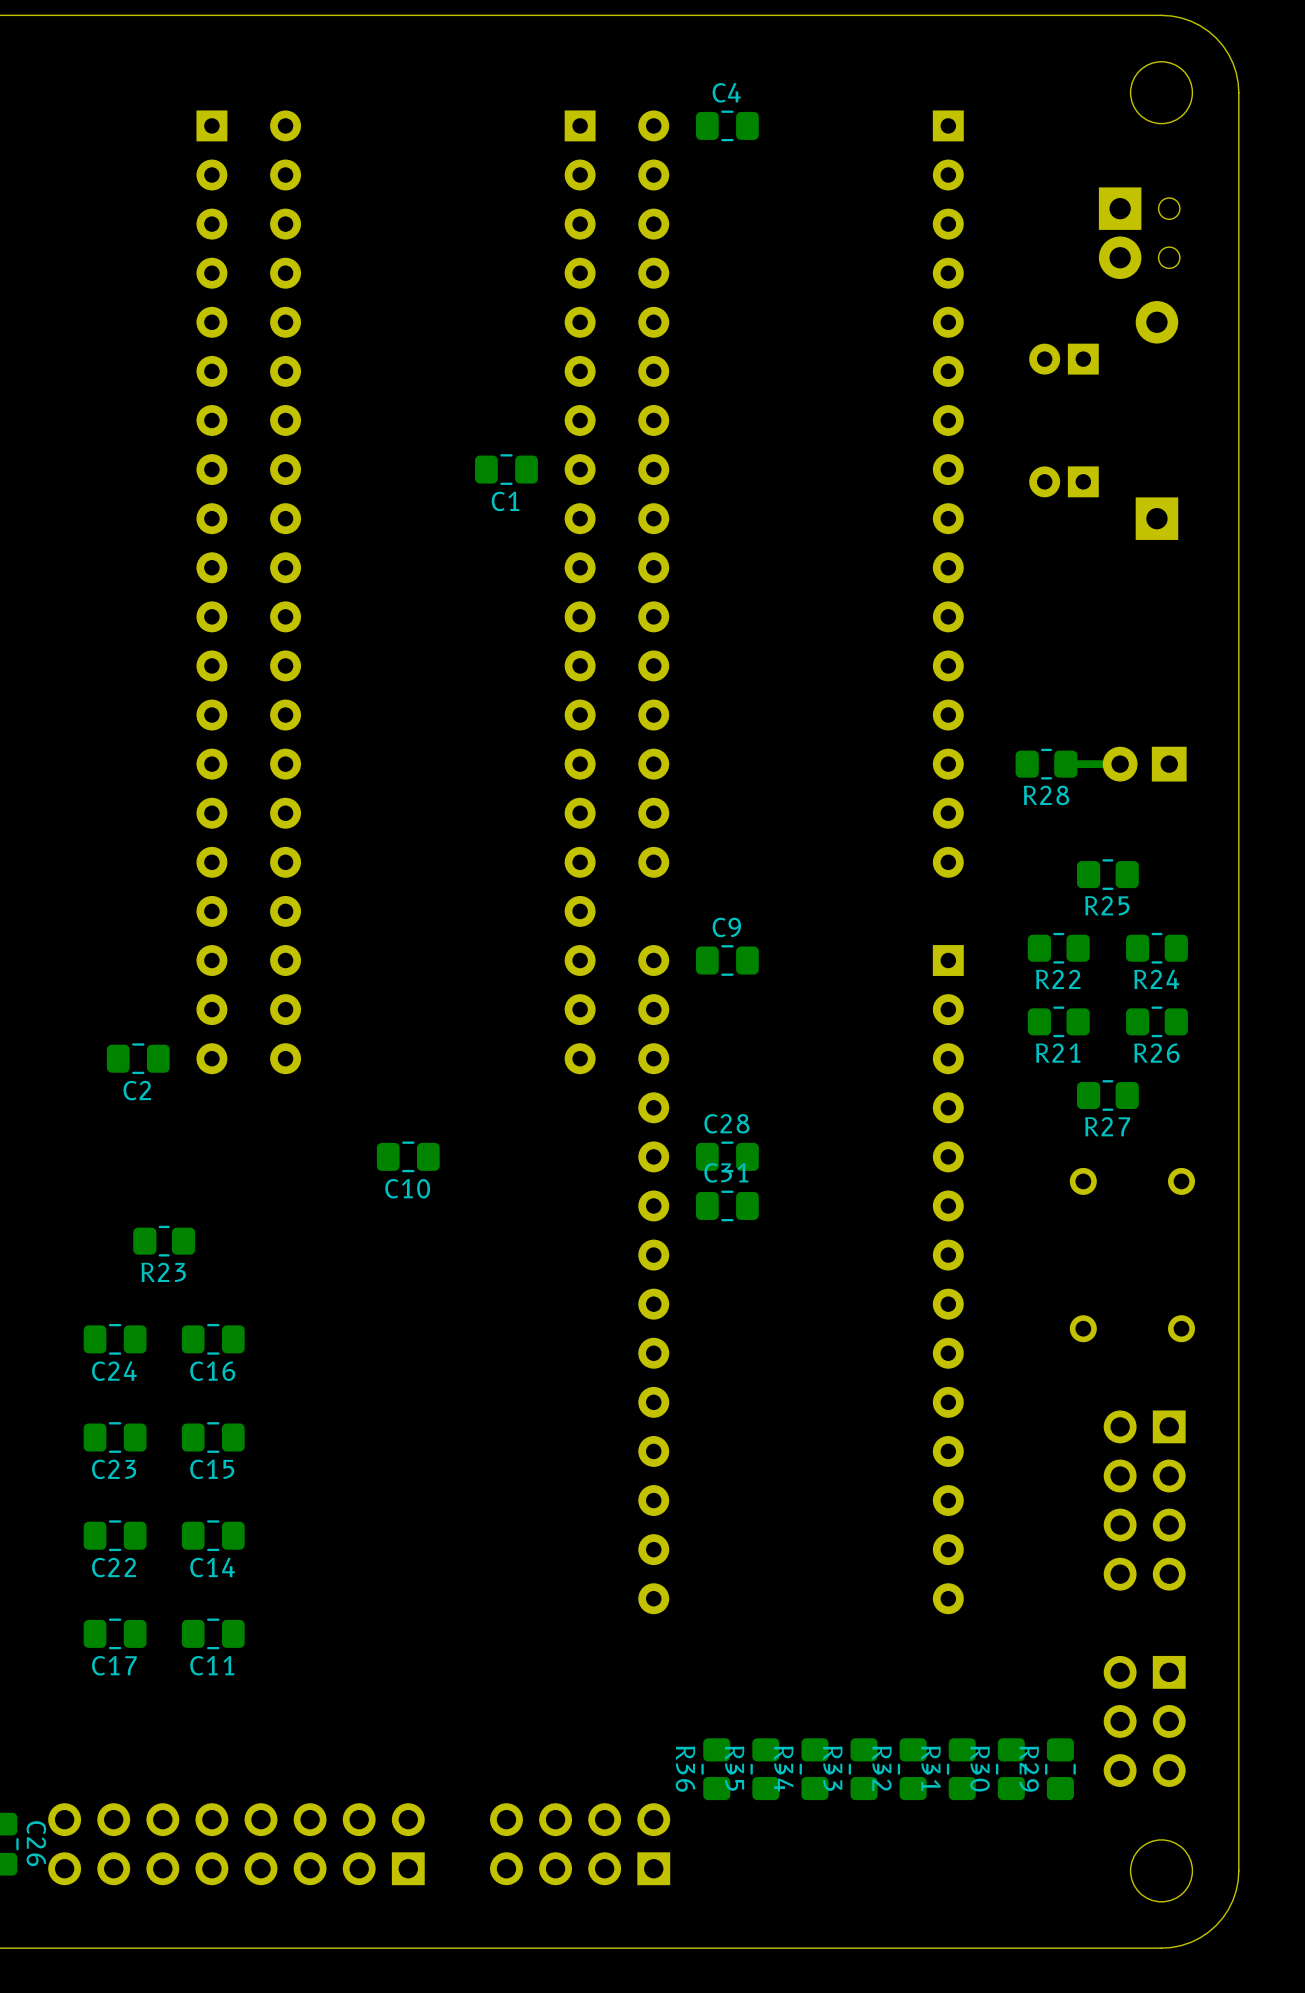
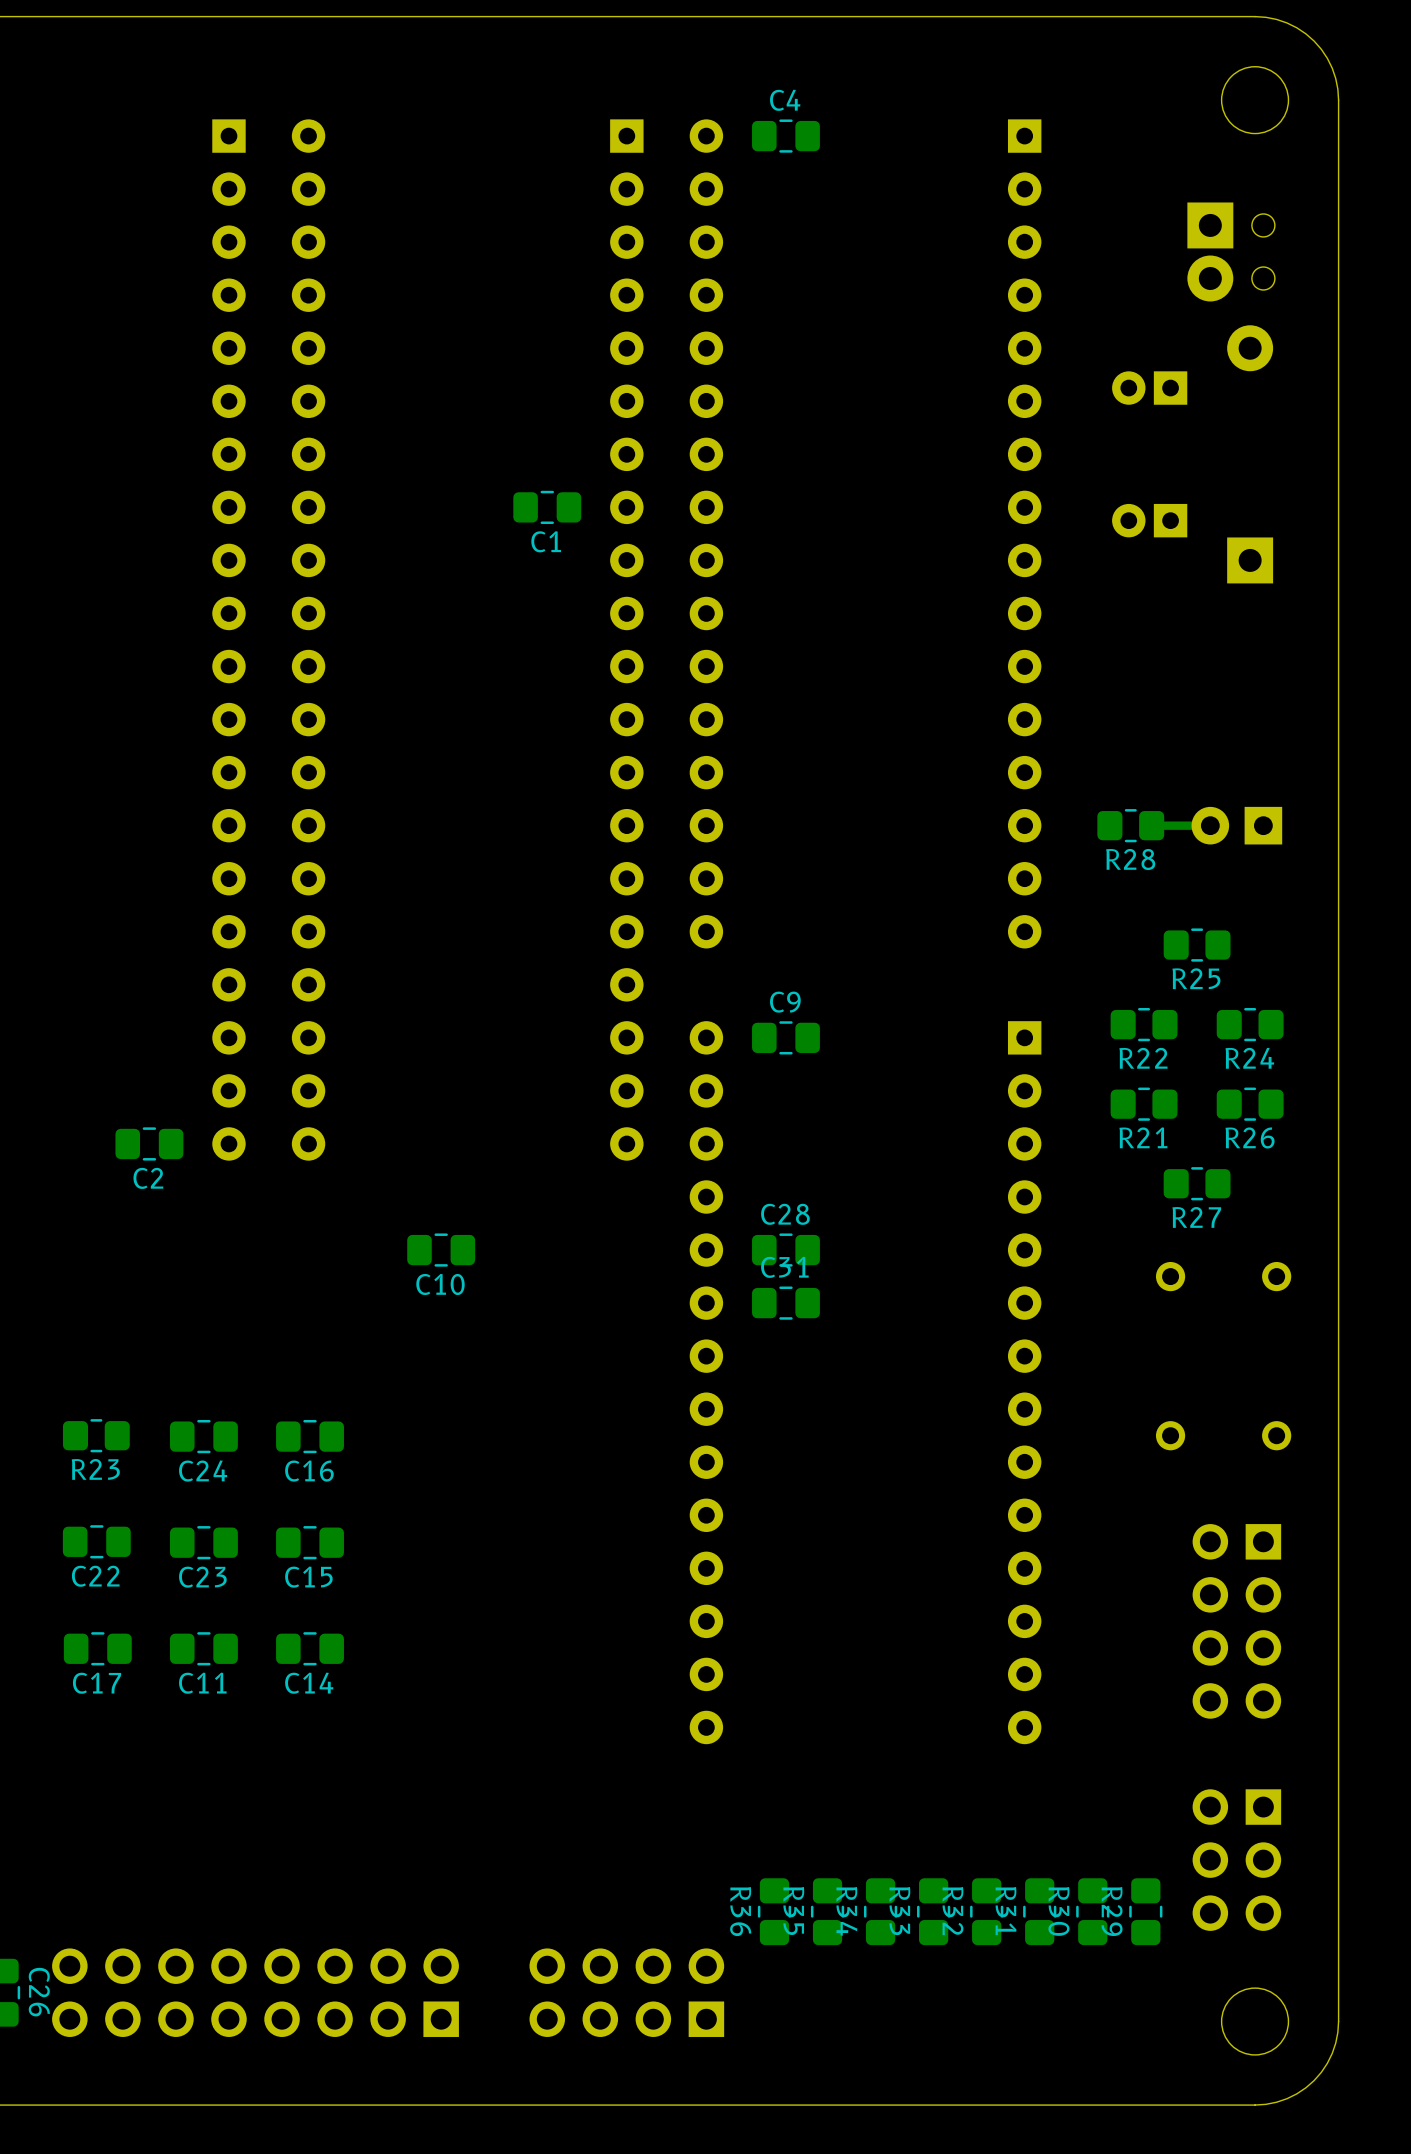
R23 position: (164, 1241) -> (96, 1435)
C24 position: (115, 1339) -> (203, 1436)
C16 position: (213, 1339) -> (310, 1436)
C23 position: (115, 1437) -> (203, 1542)
C15 position: (213, 1437) -> (310, 1542)
C22 position: (115, 1535) -> (96, 1541)
C14 position: (213, 1535) -> (310, 1648)
C17 position: (115, 1633) -> (97, 1648)
C11 position: (213, 1633) -> (203, 1648)

